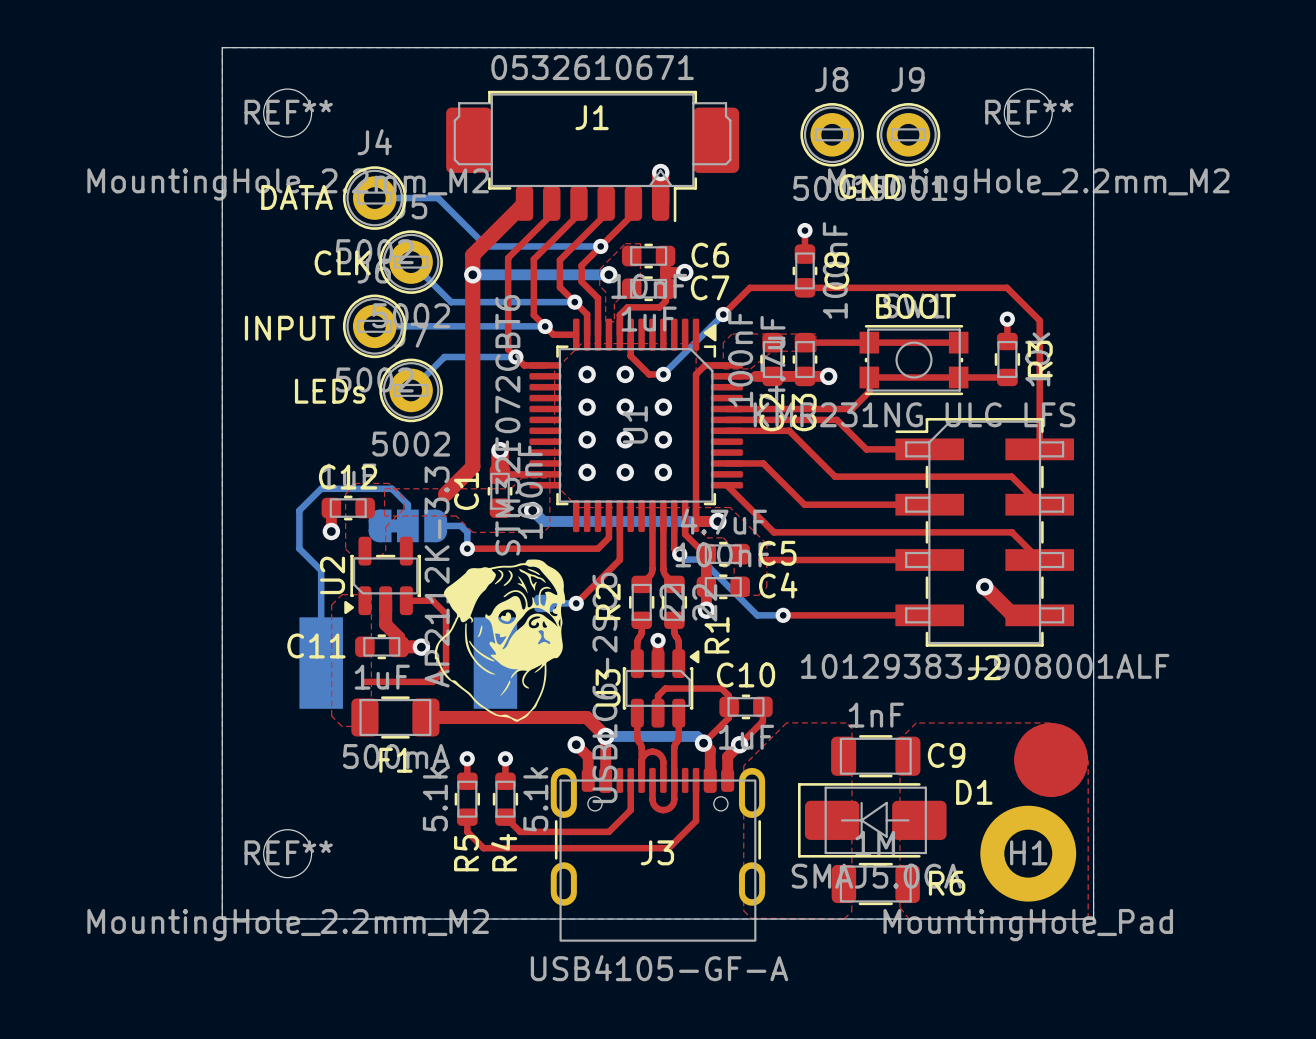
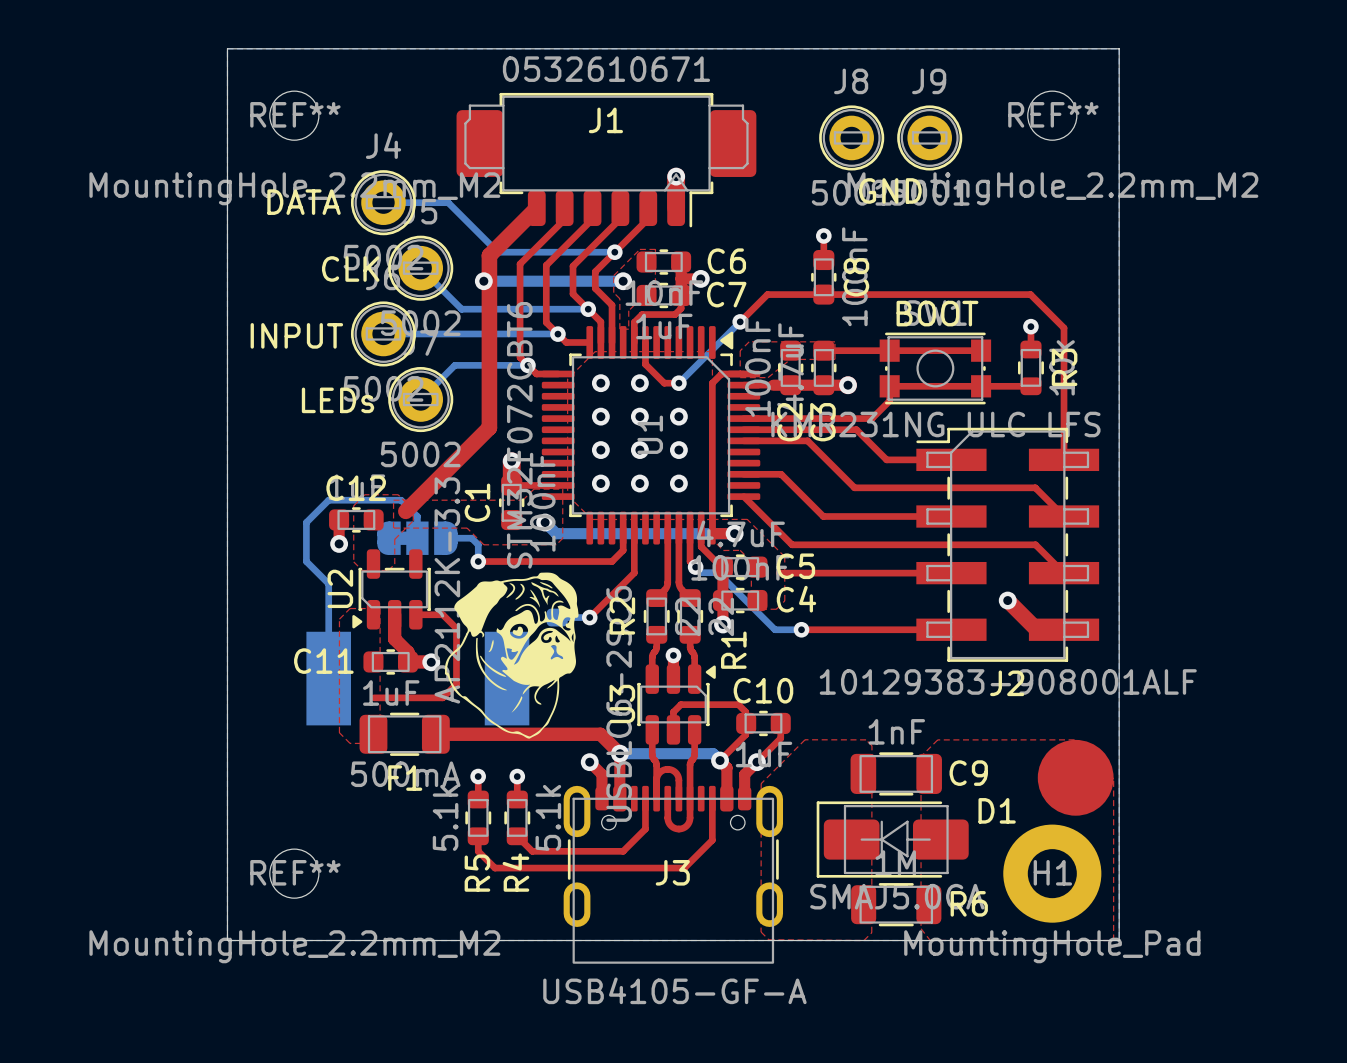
top track: (478, 249) (472, 255) (472, 467) (445, 494) -> (489, 255) (489, 427) (405, 511)

